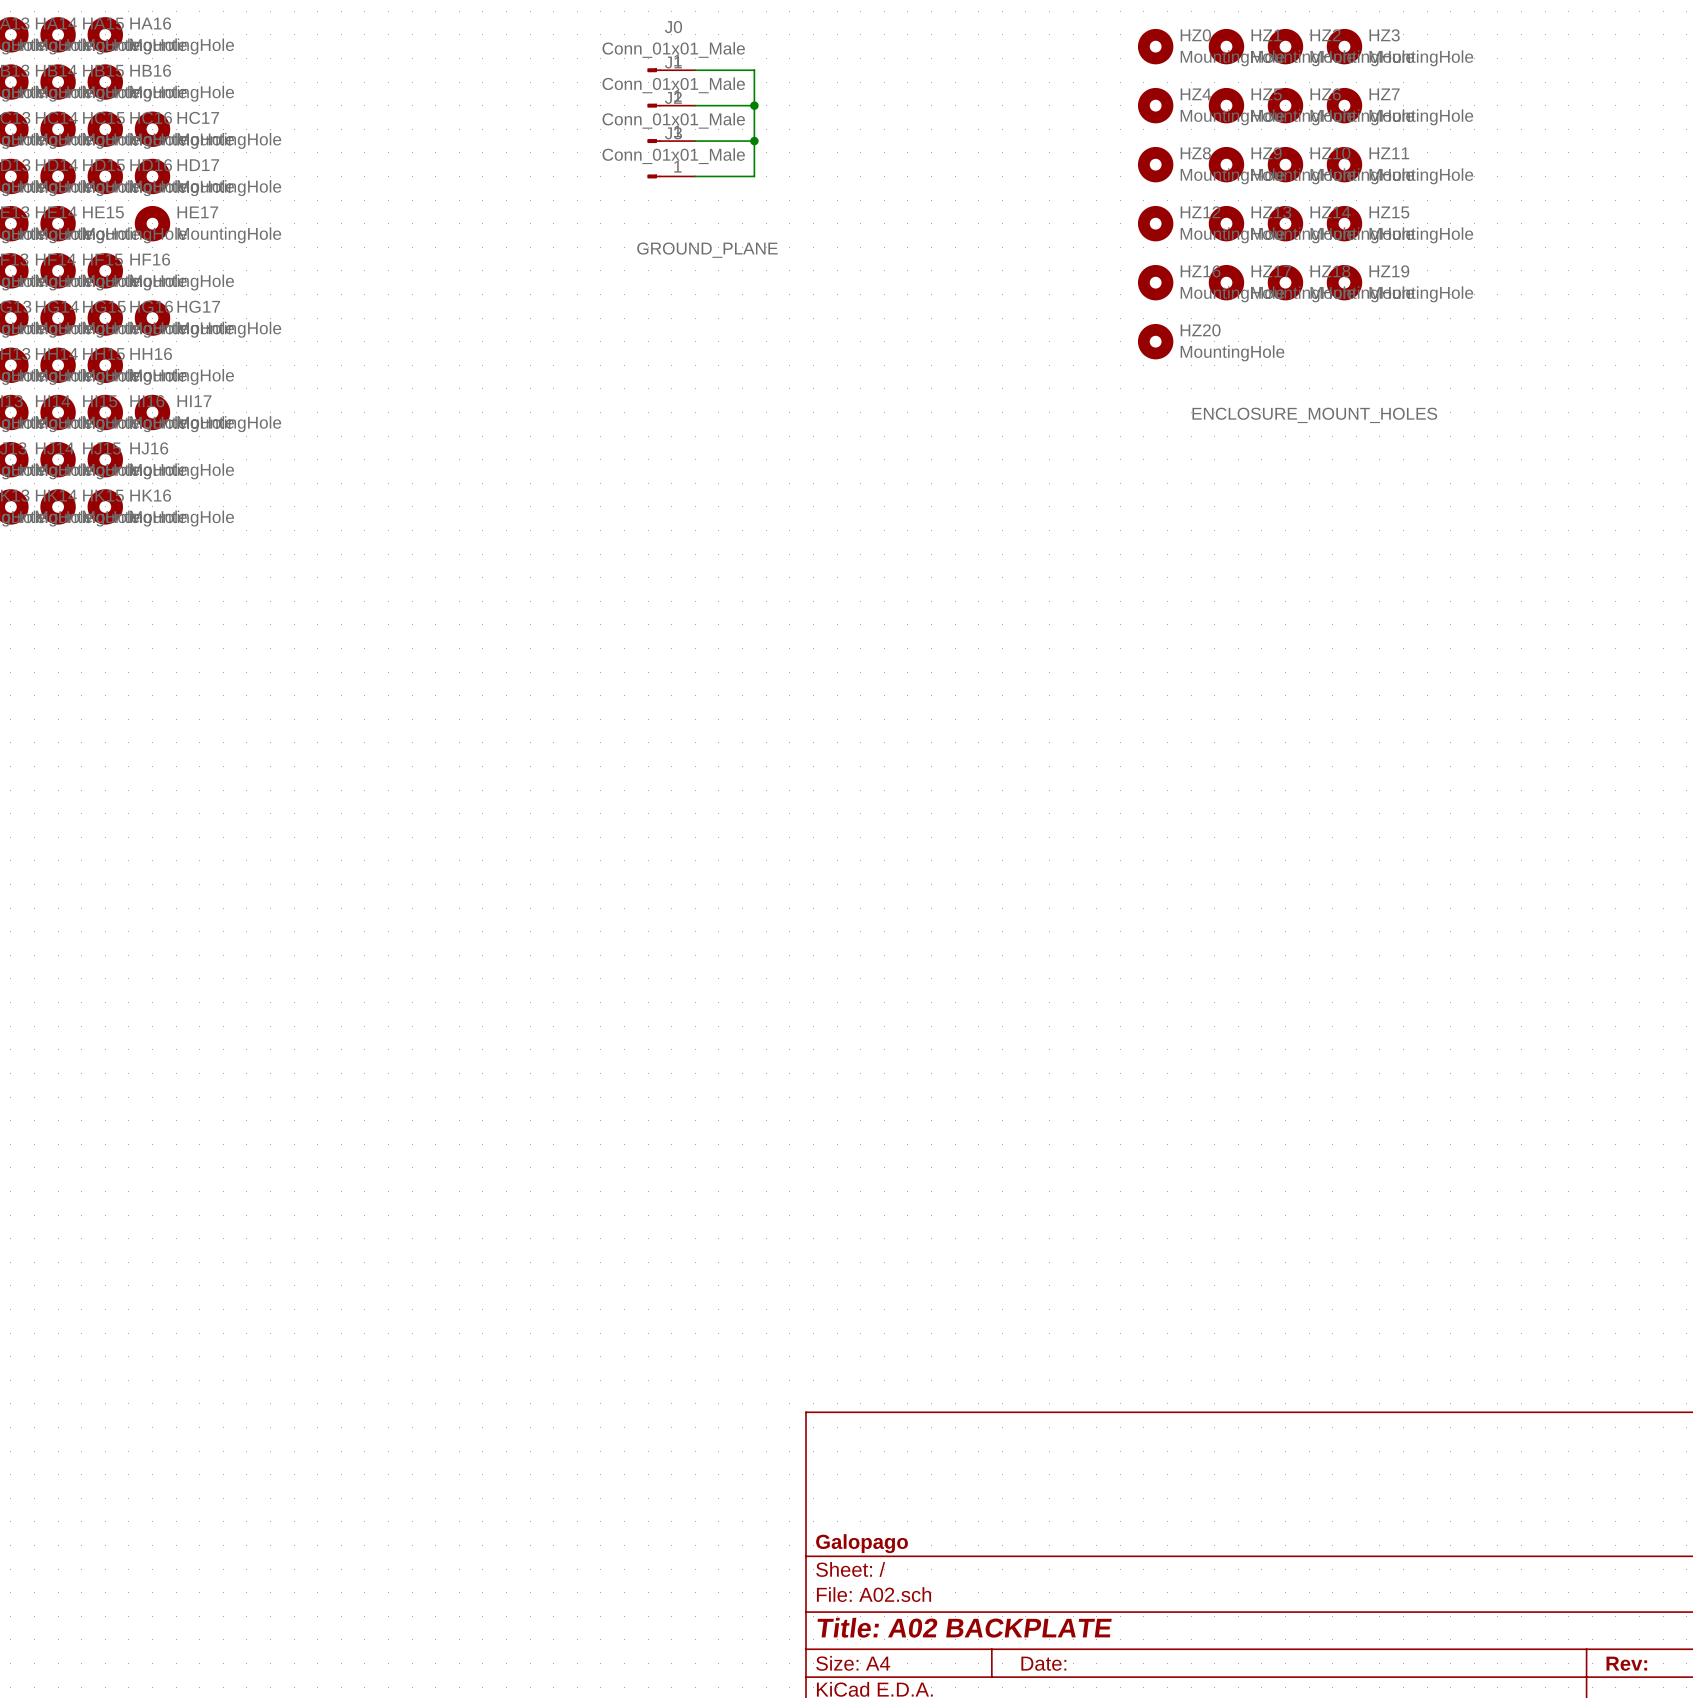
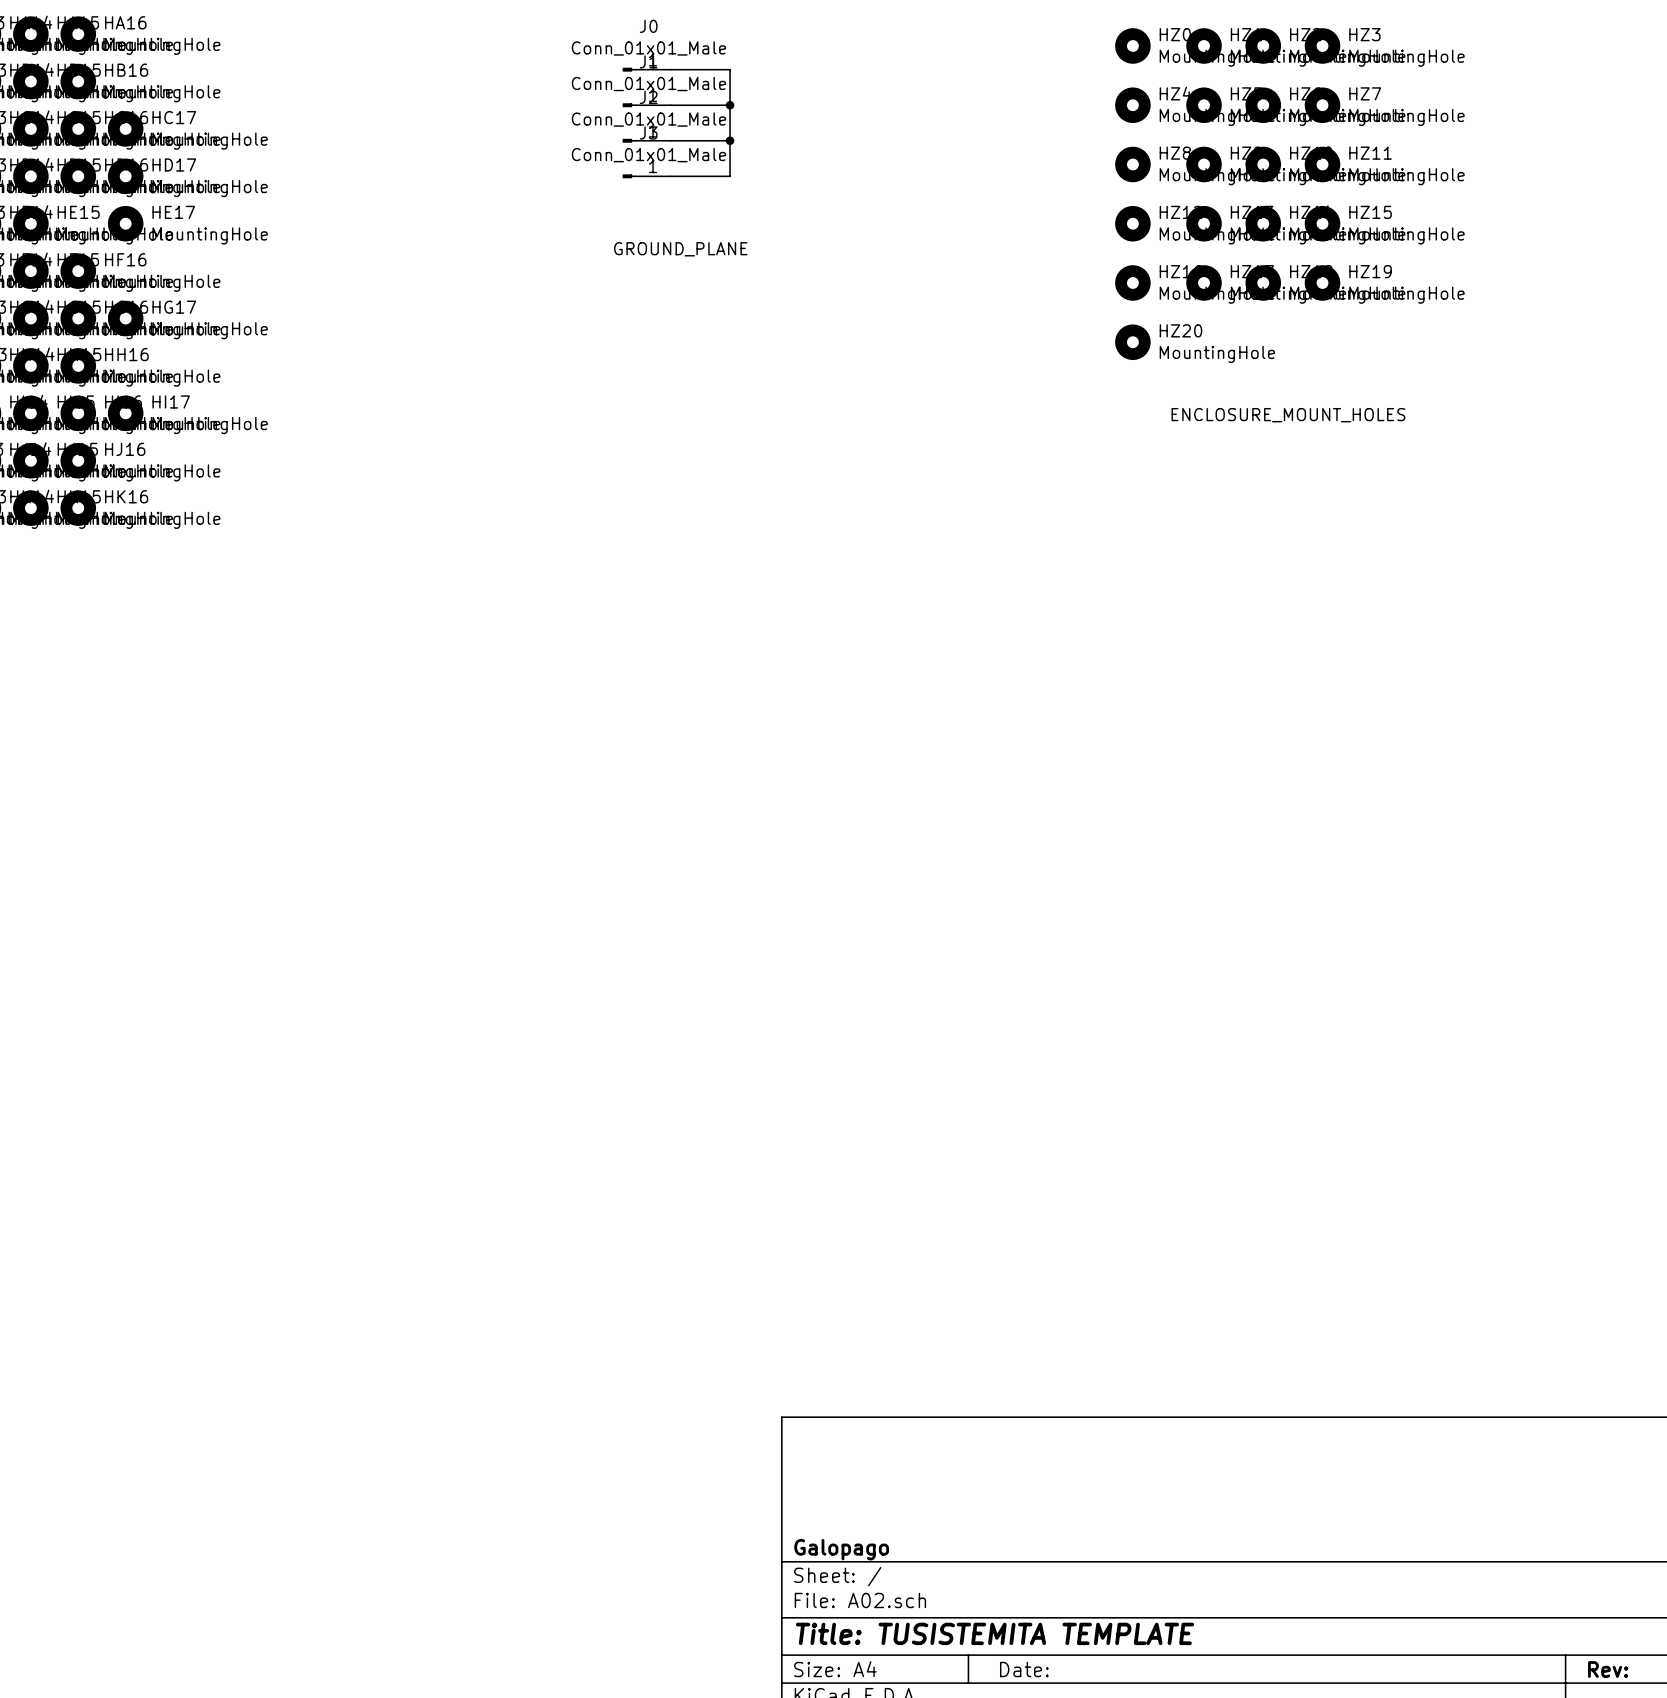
title block: Title: A02 BACKPLATE (964, 1627) -> Title: TUSISTEMITA TEMPLATE (995, 1633)

